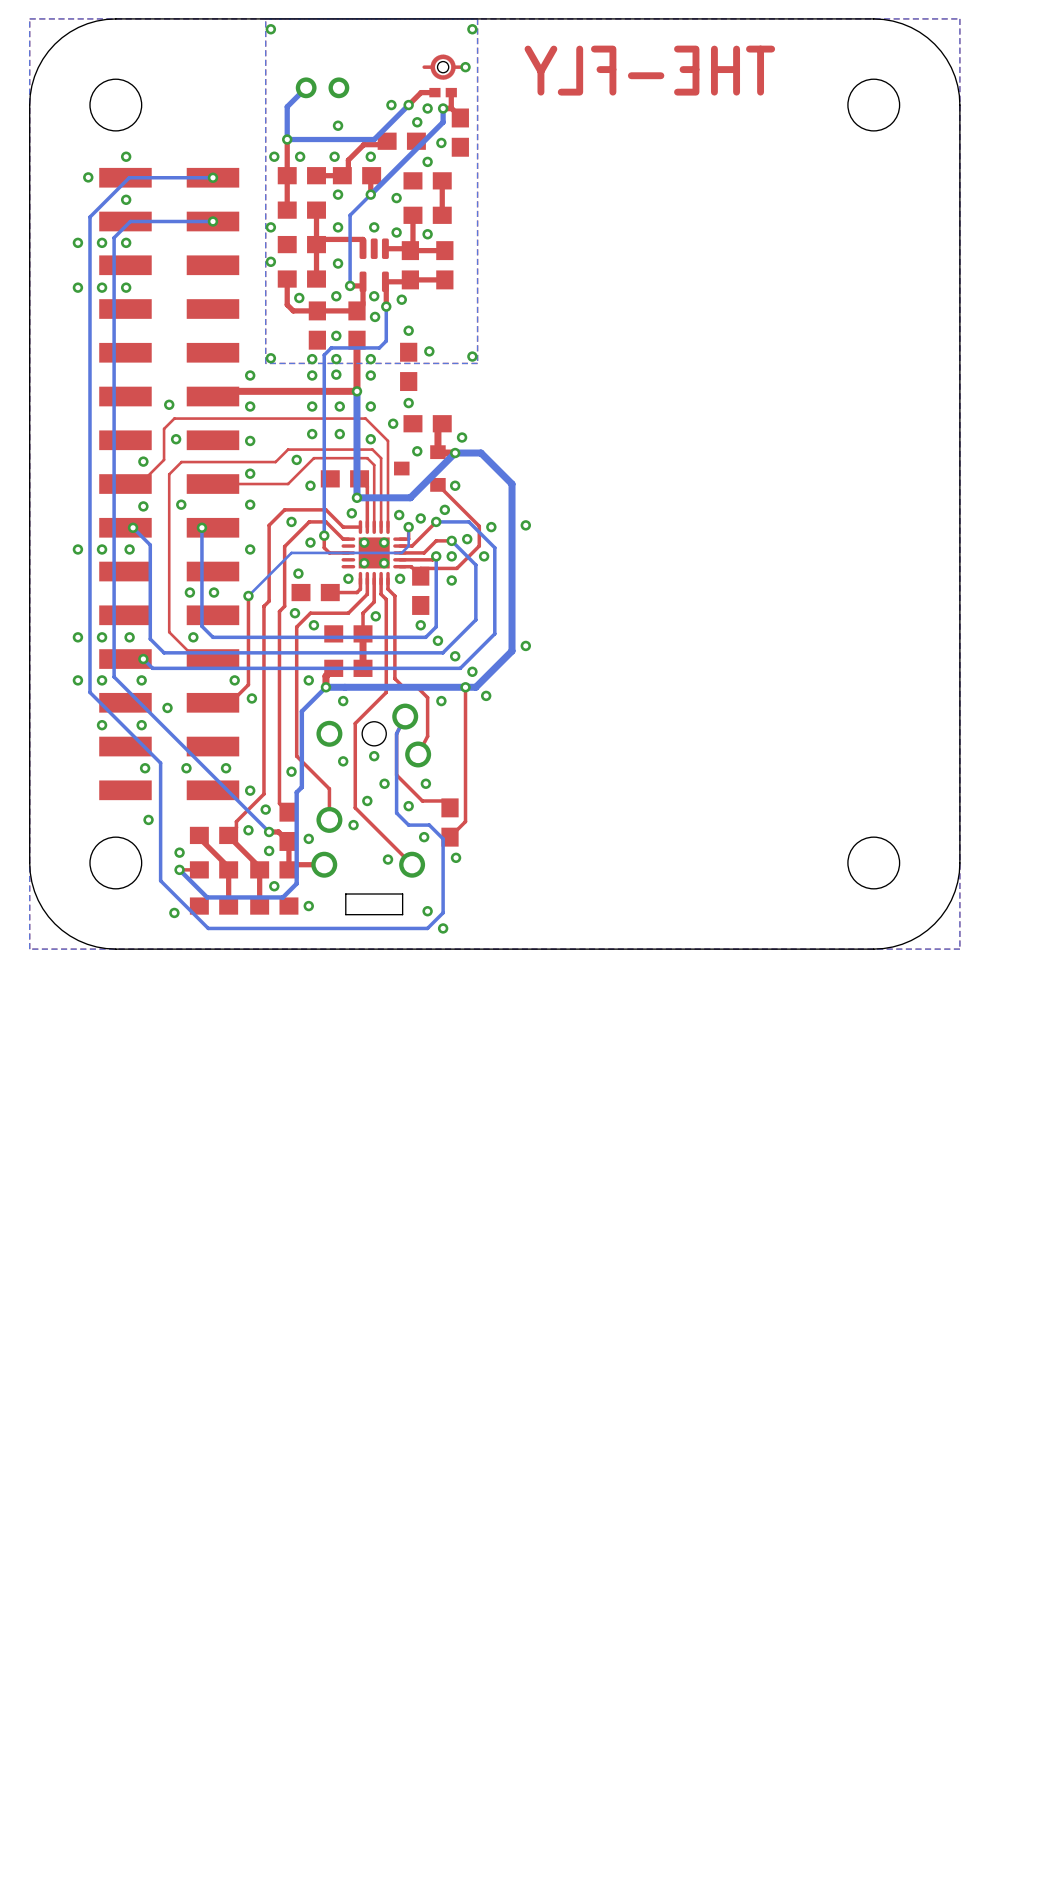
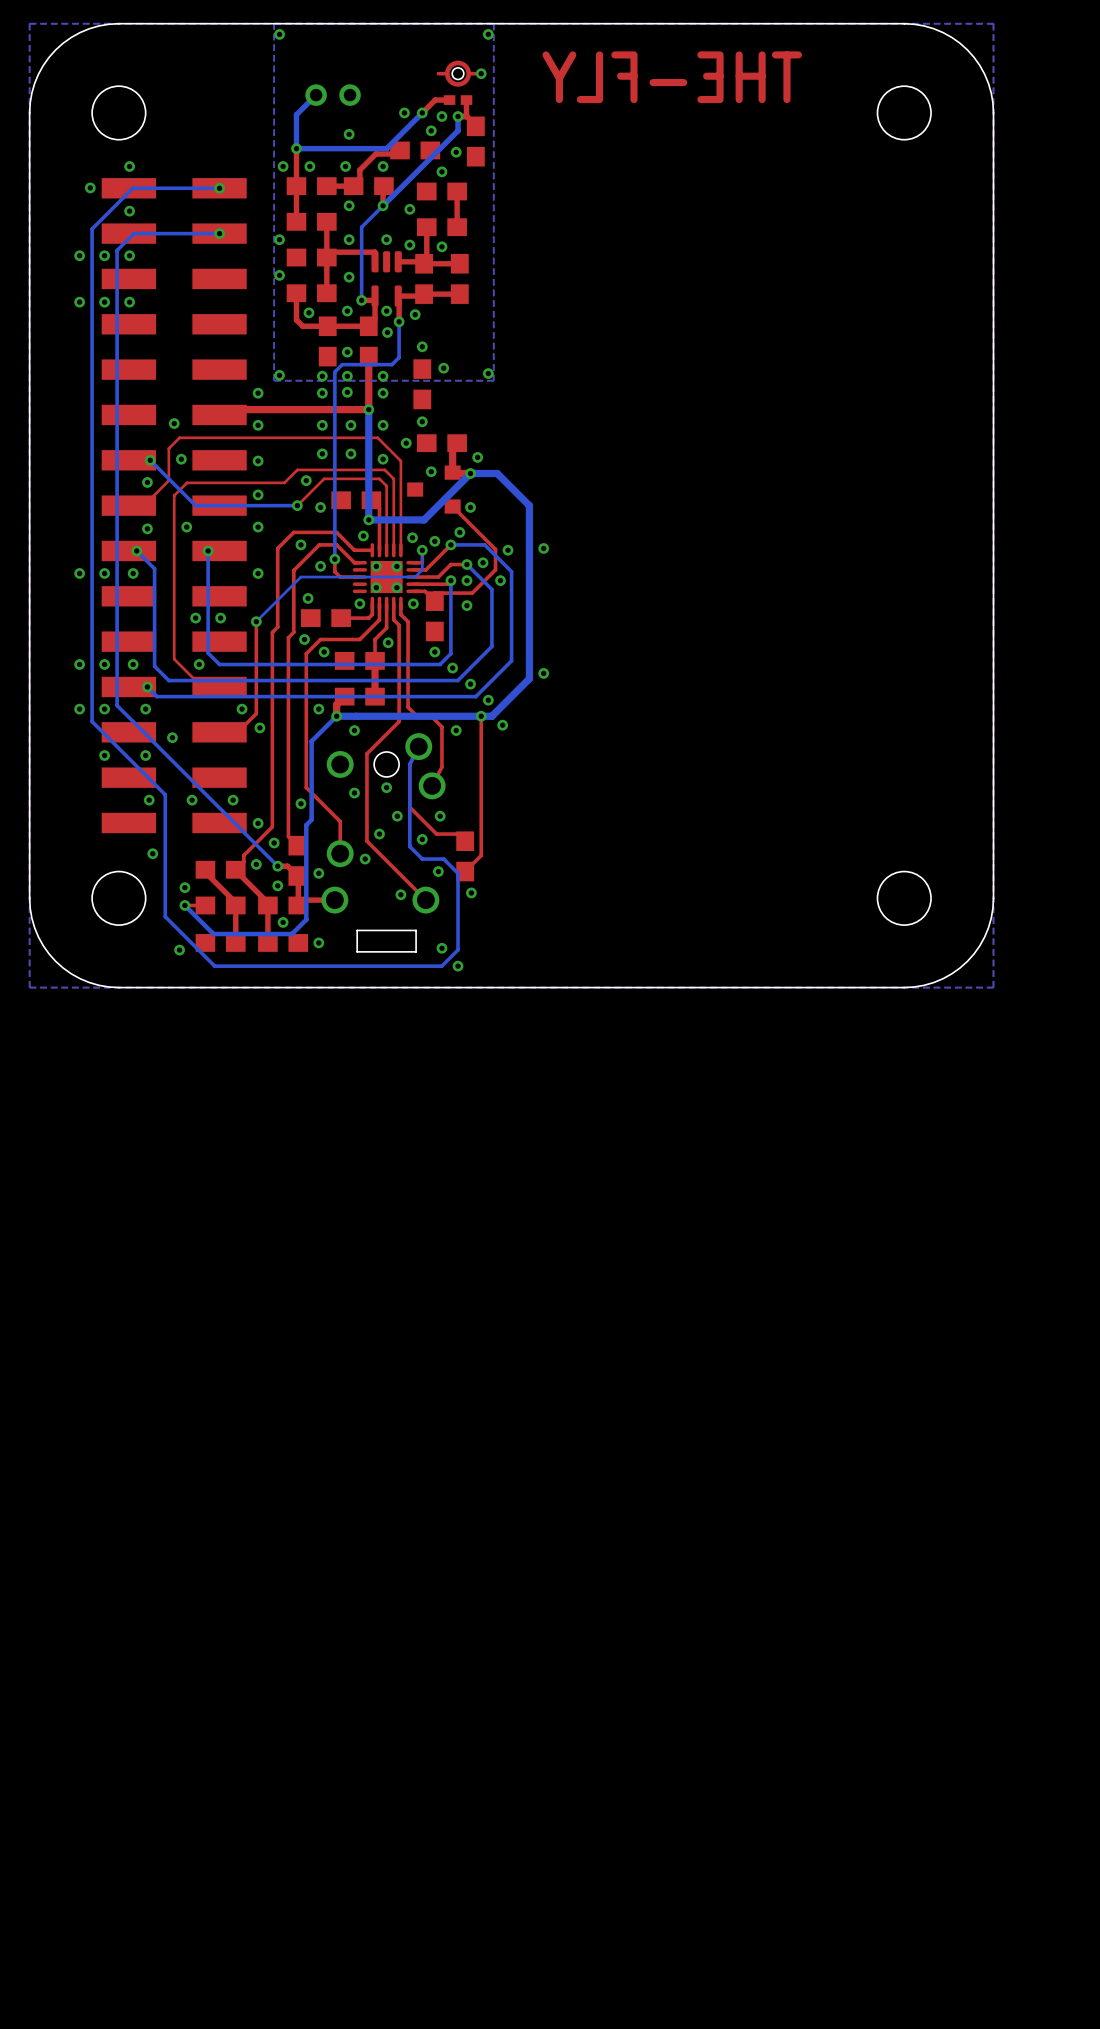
bottom track: none -> (150, 460) (195, 505) (297, 505)
via: none -> (150, 460)
top track: (288, 484) (212, 484) -> none
via: none -> (297, 505)

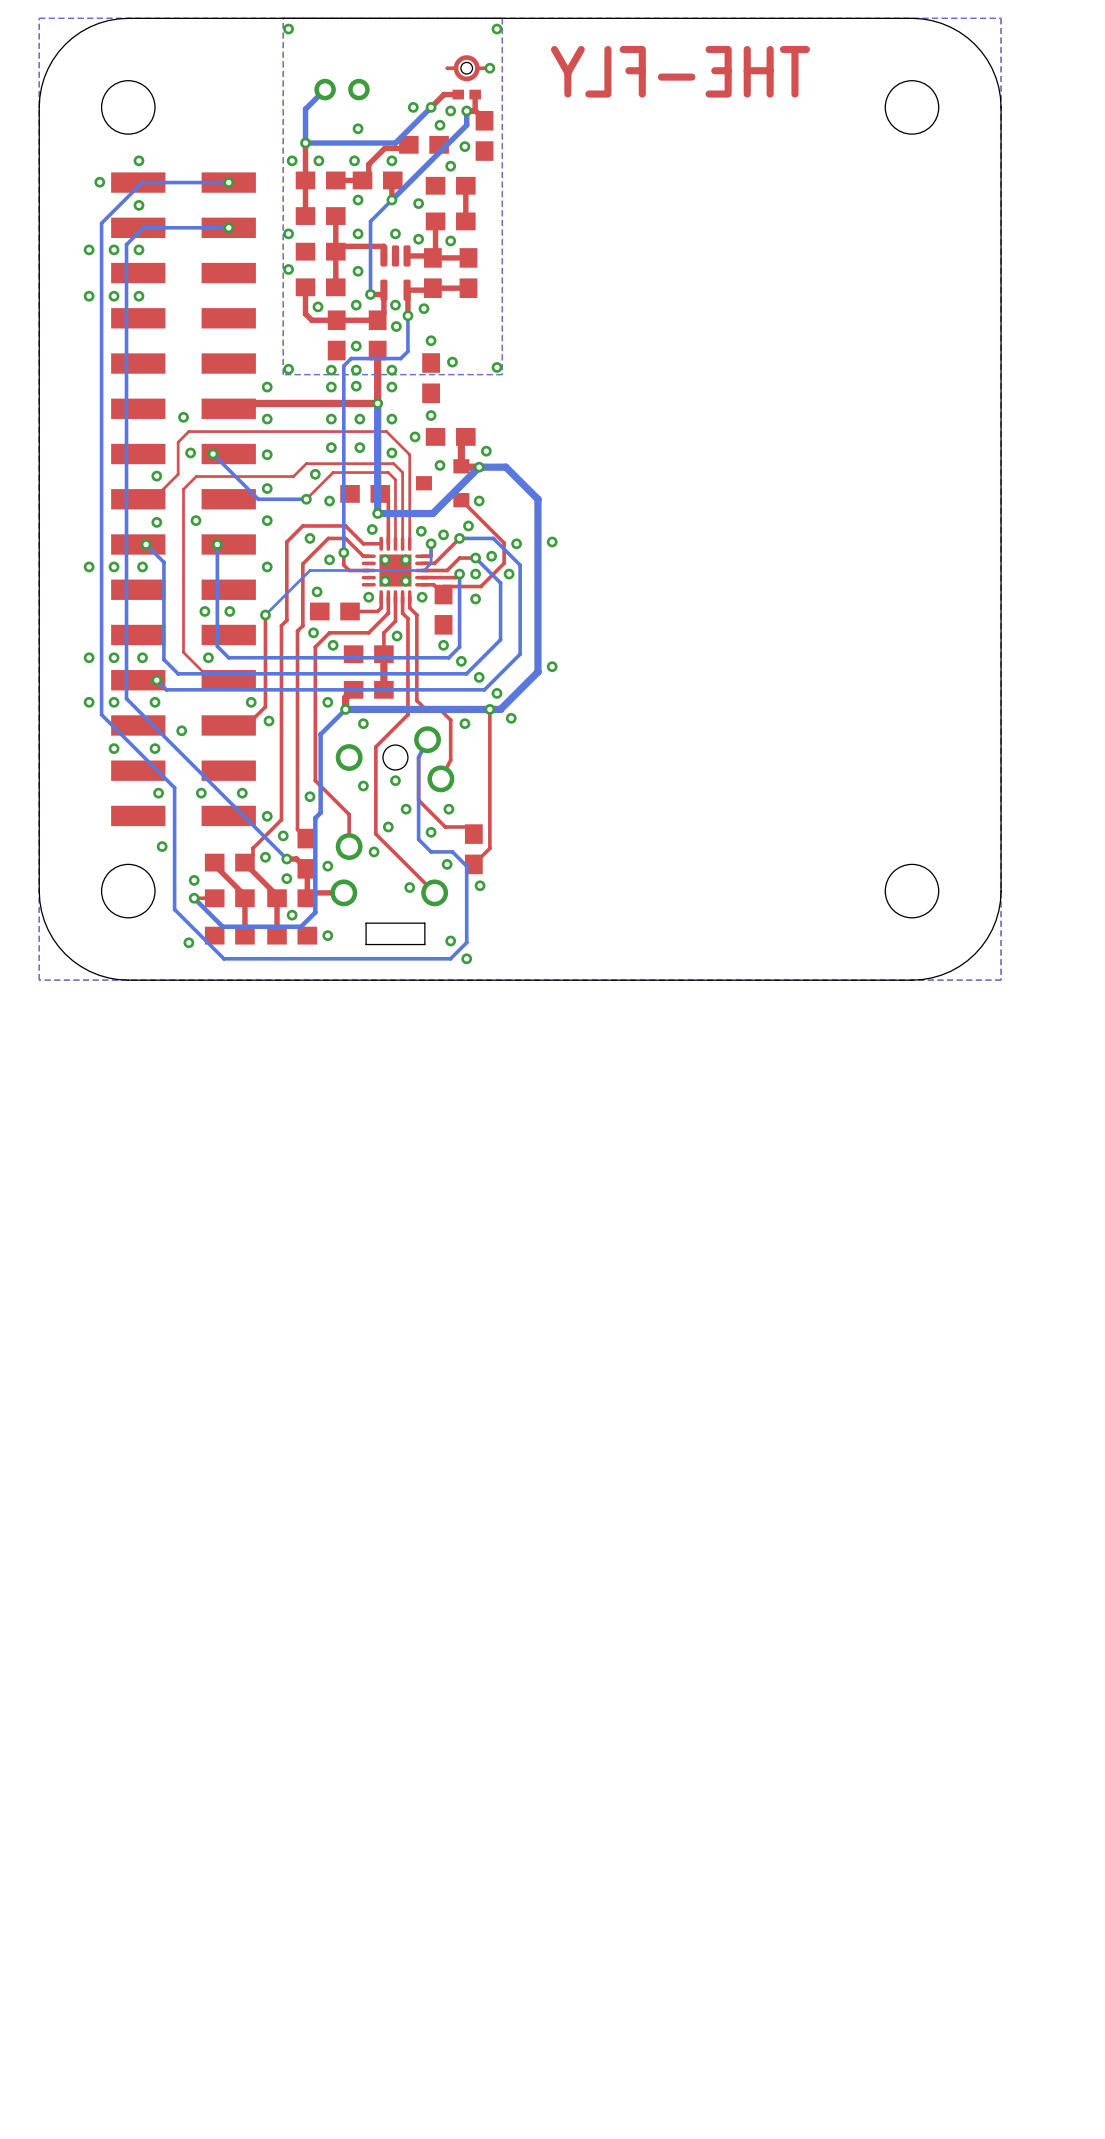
bottom track: (150, 460) (195, 505) (249, 505) -> (213, 454) (258, 499)
via position: (150, 460) -> (213, 454)

